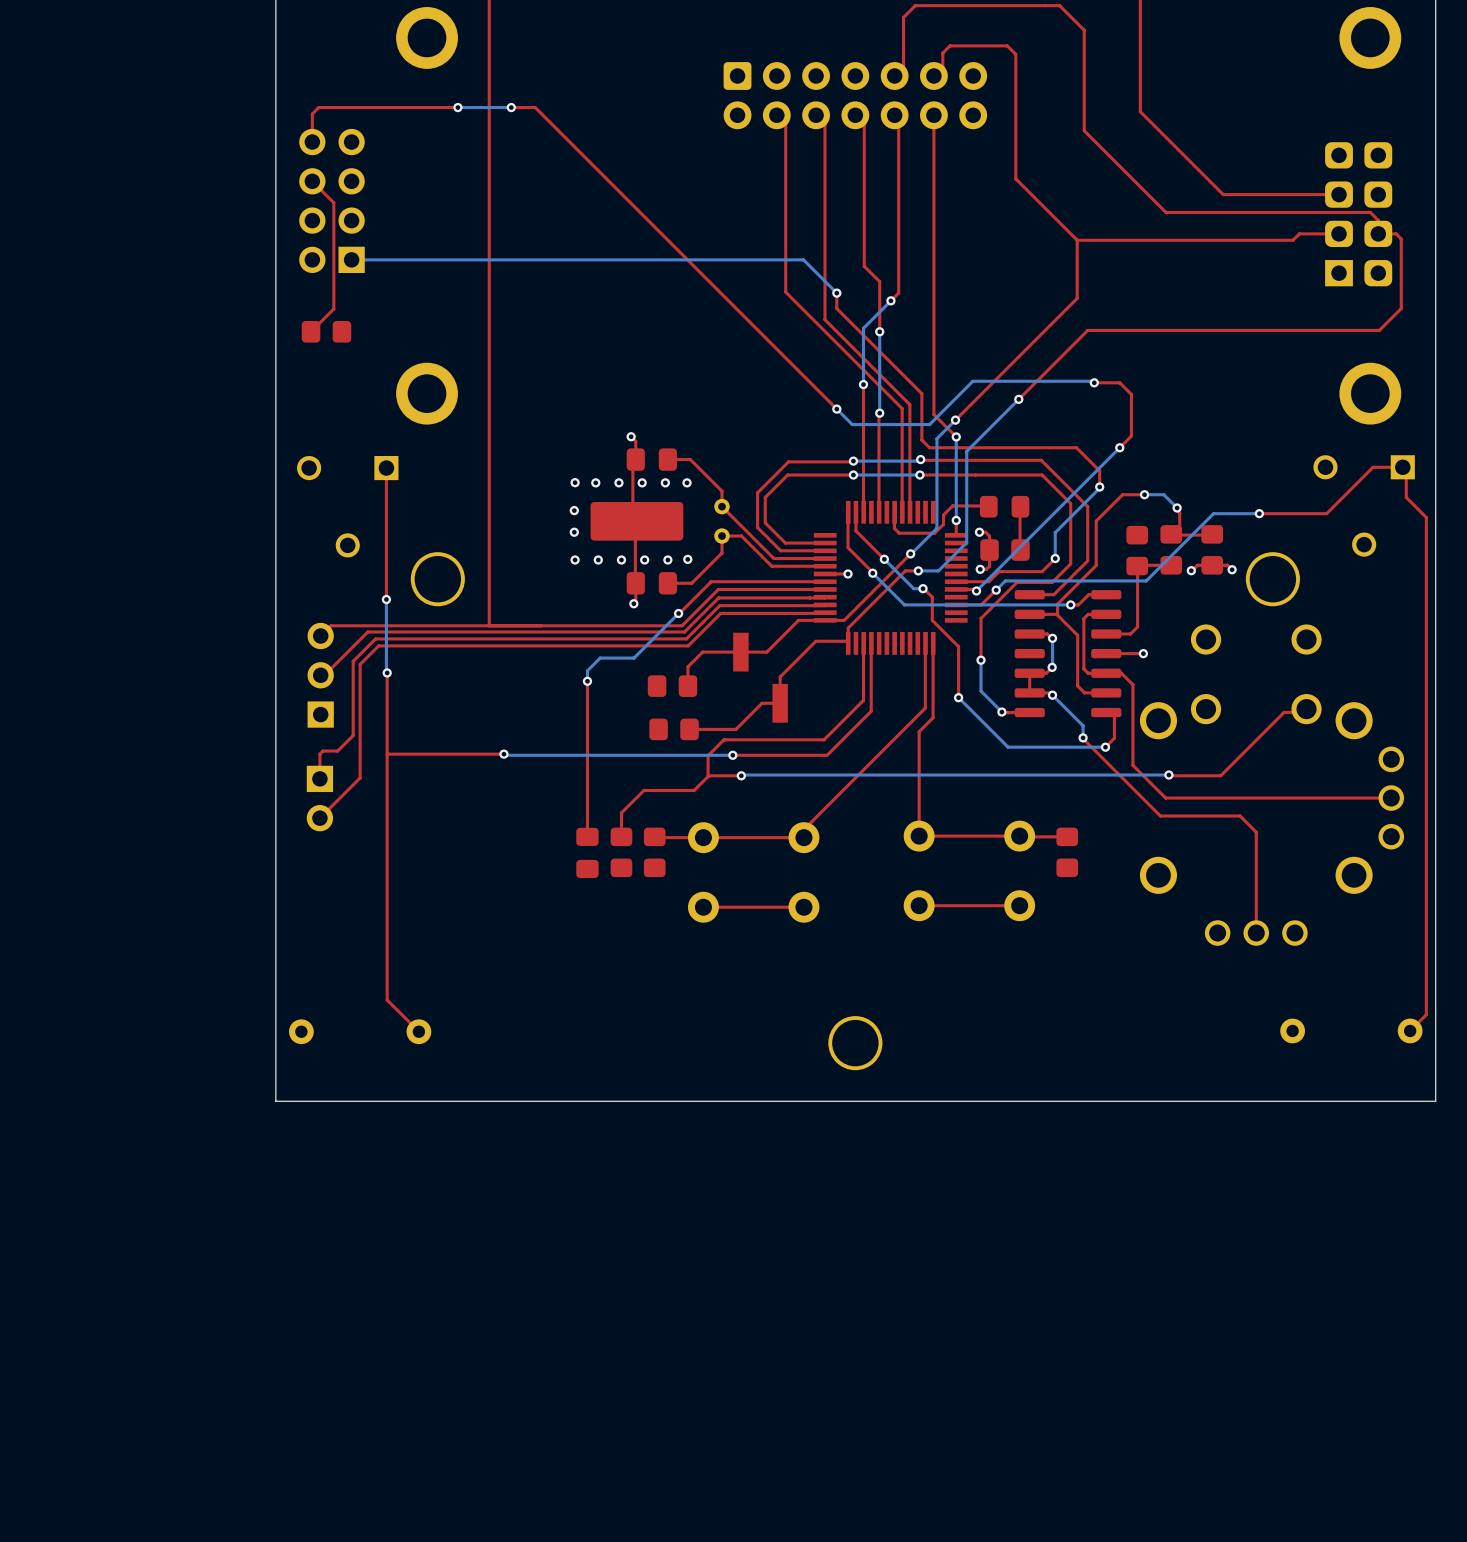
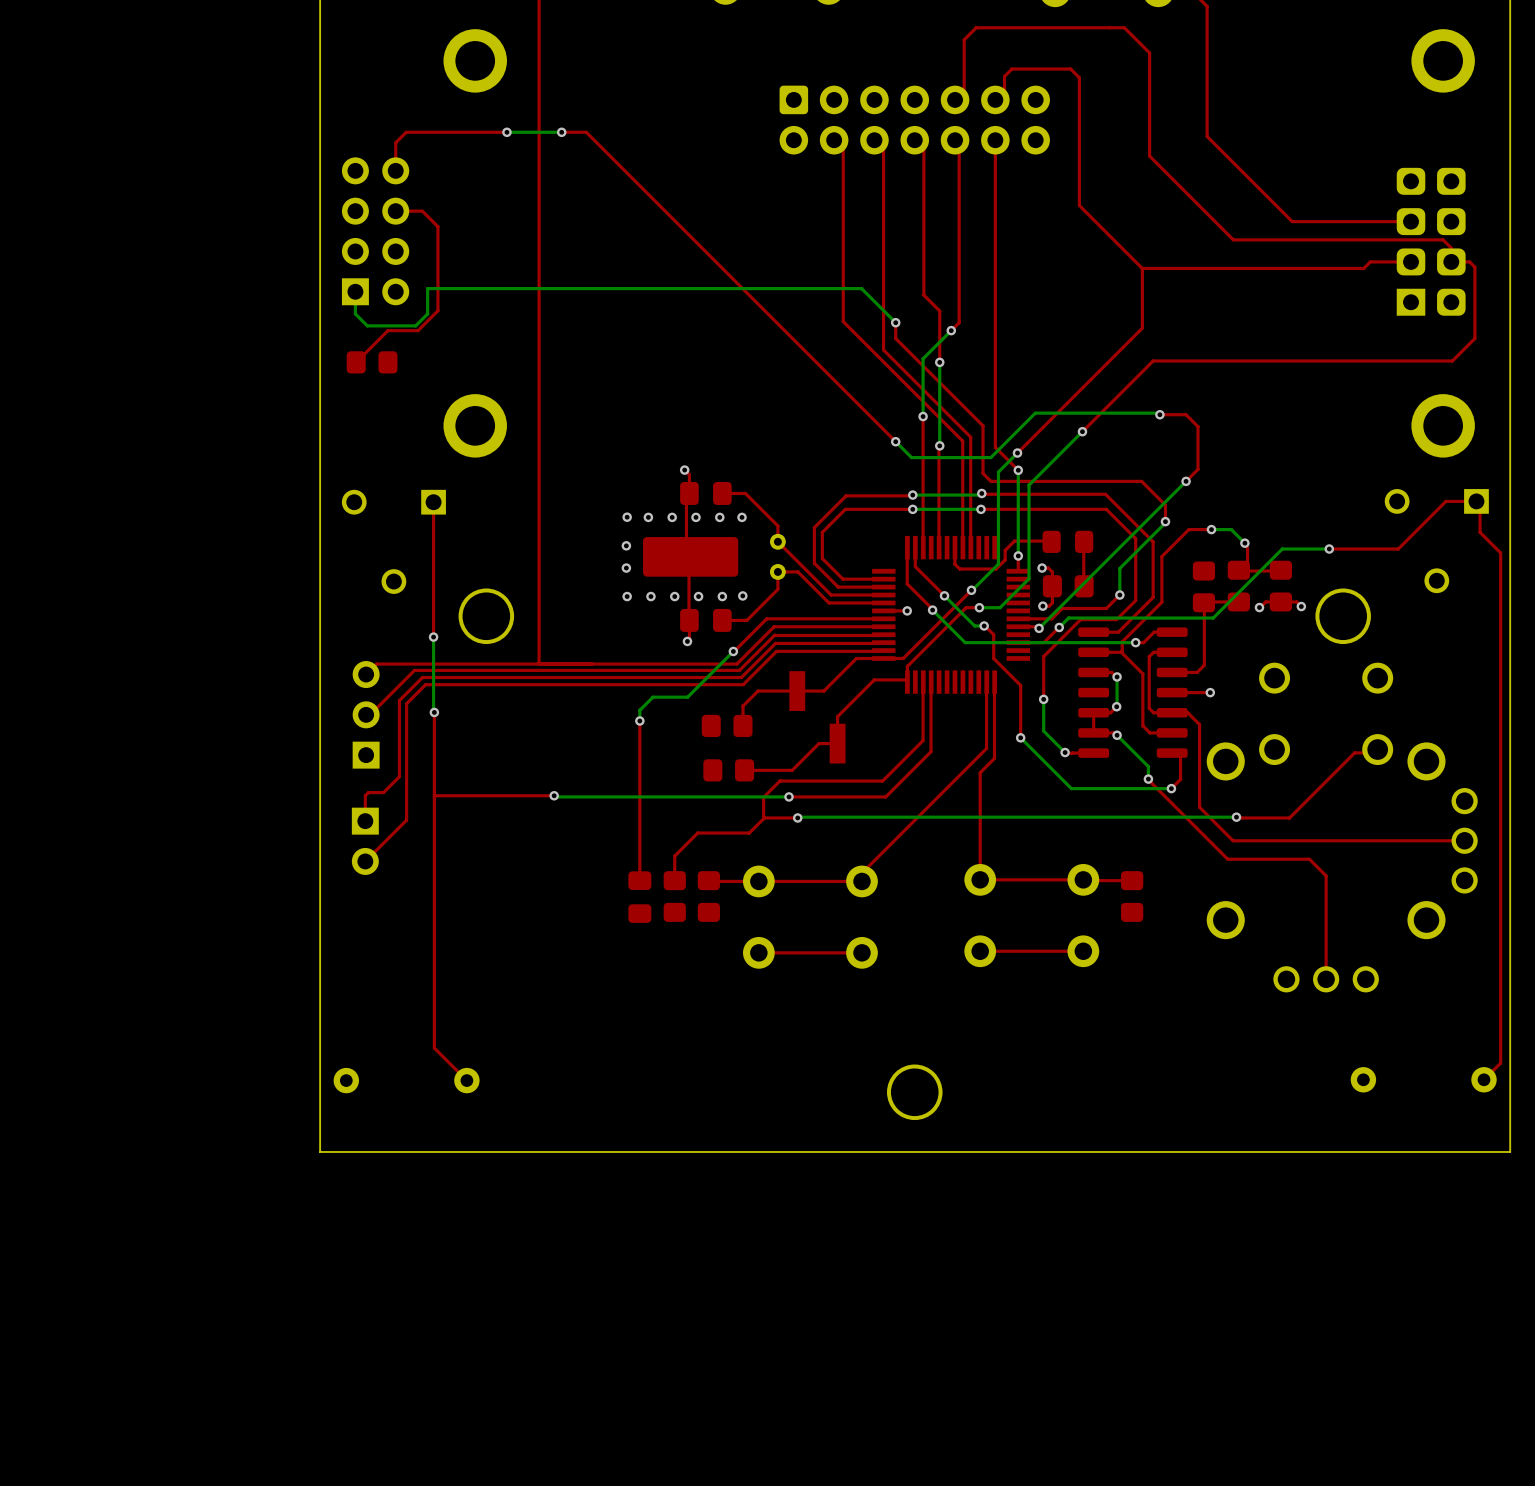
top track: (359, 107) (318, 107) (312, 113) (312, 142) -> (406, 132) (395, 142) (395, 170)
part footprint: [299, 128, 365, 274] -> [341, 157, 410, 306]
top track: (312, 181) (333, 202) (333, 308) -> (395, 211) (422, 211) (437, 226) (437, 310) (418, 330) (387, 330) (379, 338)
bottom track: (380, 259) (351, 259) -> (427, 288) (427, 313) (415, 325) (367, 325) (355, 313) (355, 291)

